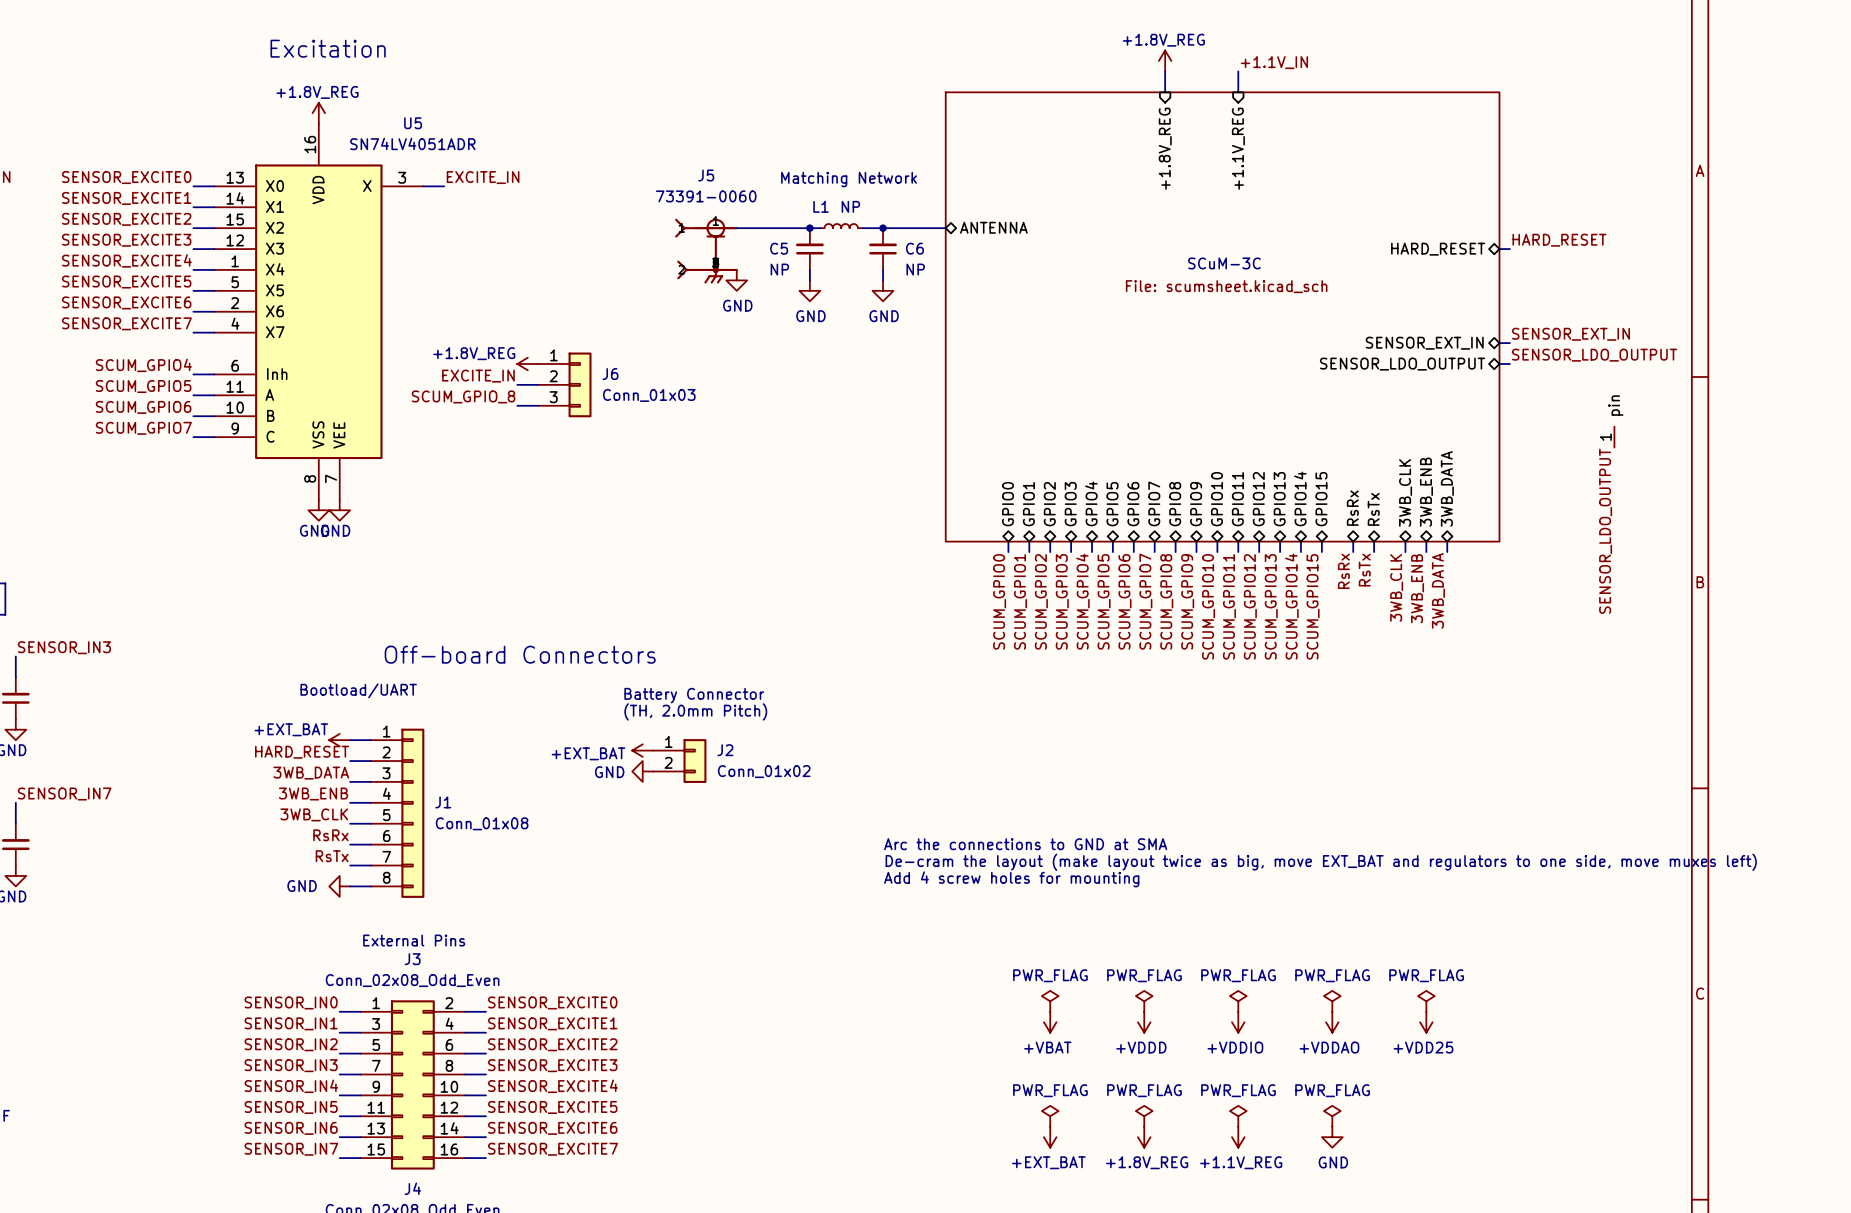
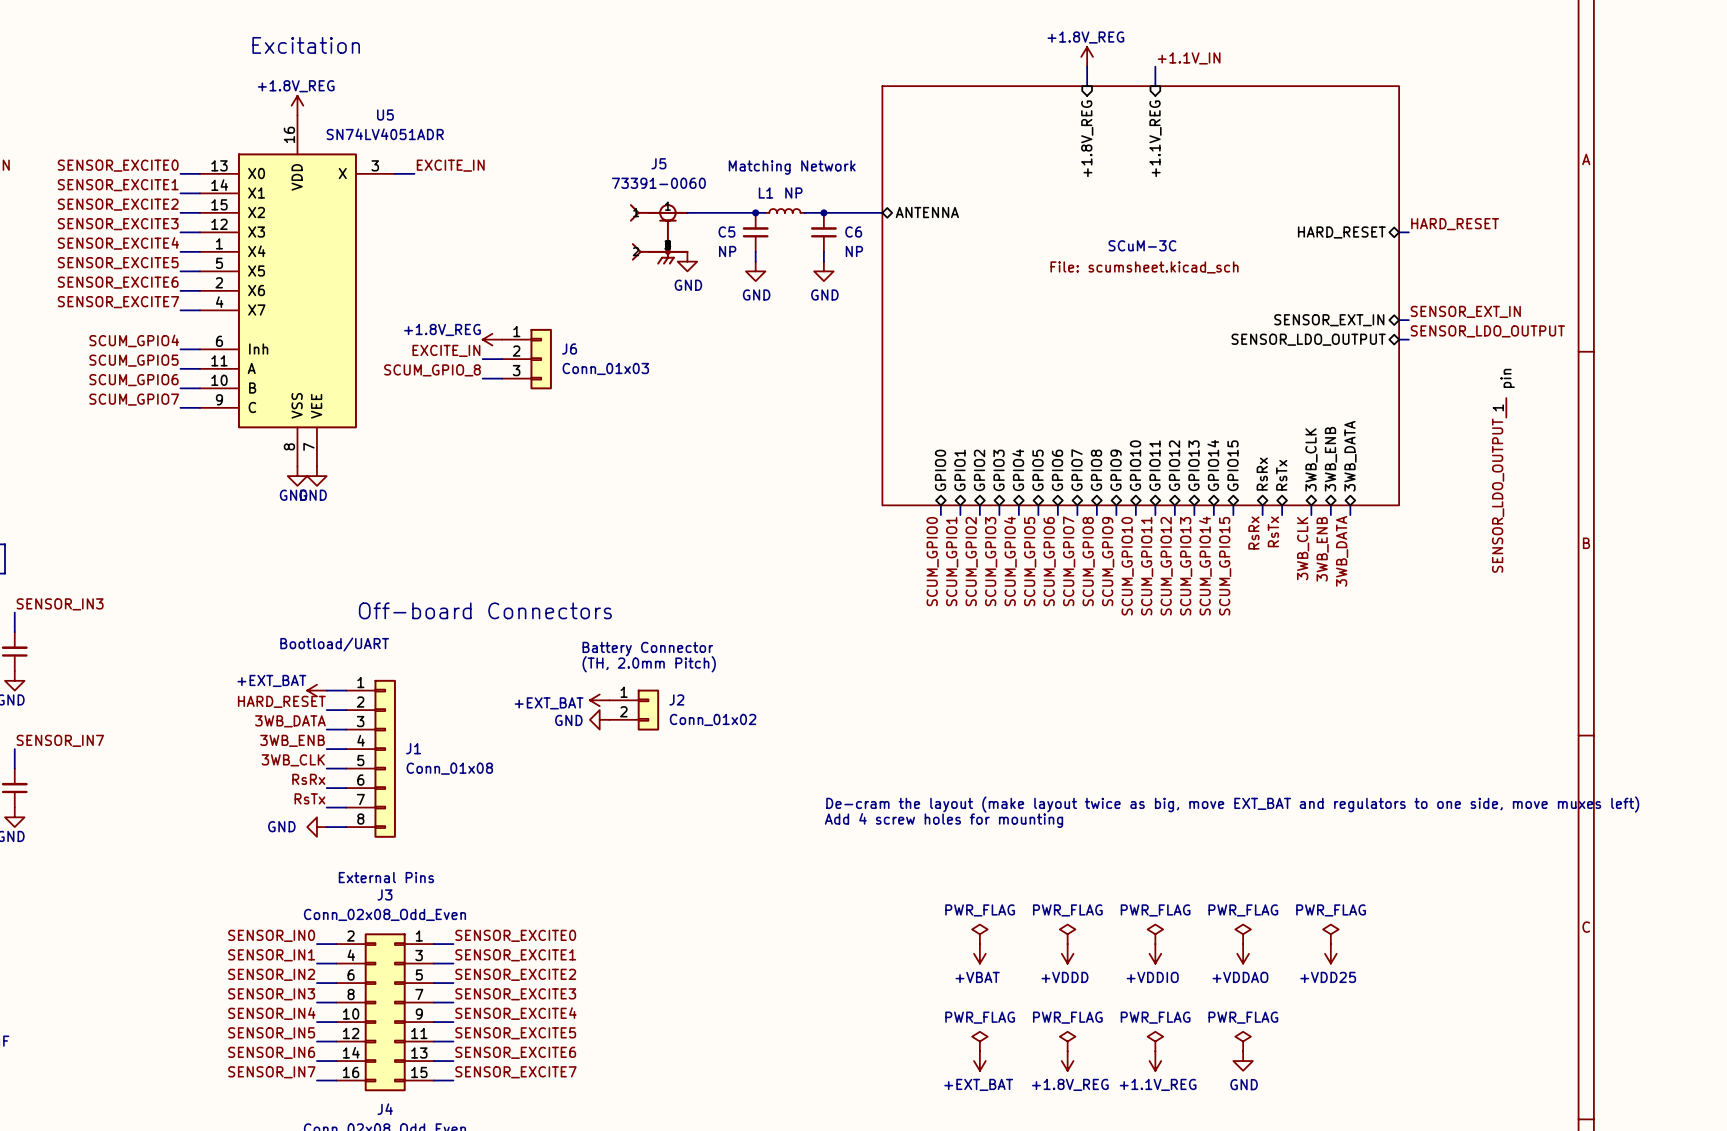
text: Arc the connections to GND at SMA (1025, 844) -> none
J3 flip: as is (412, 1084) -> left-right (385, 1012)

